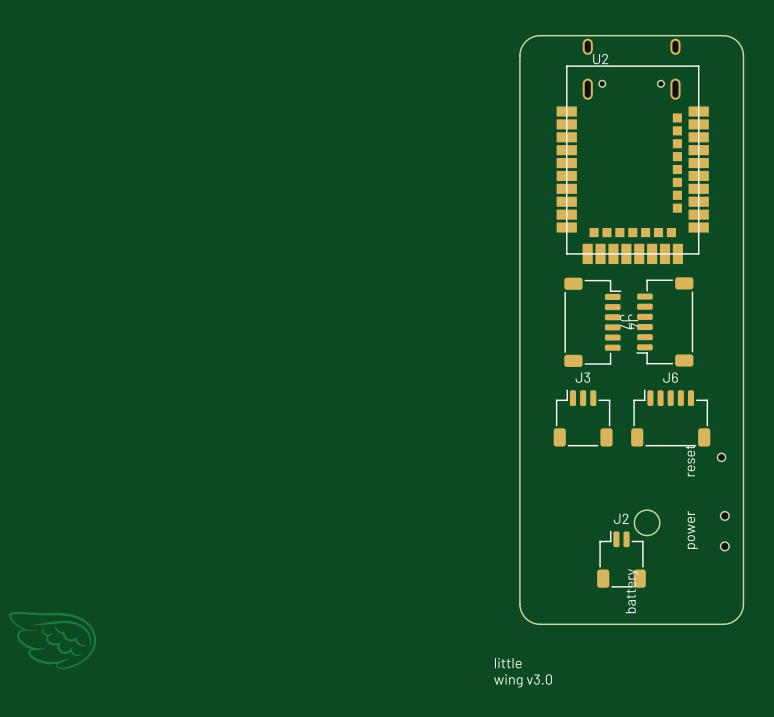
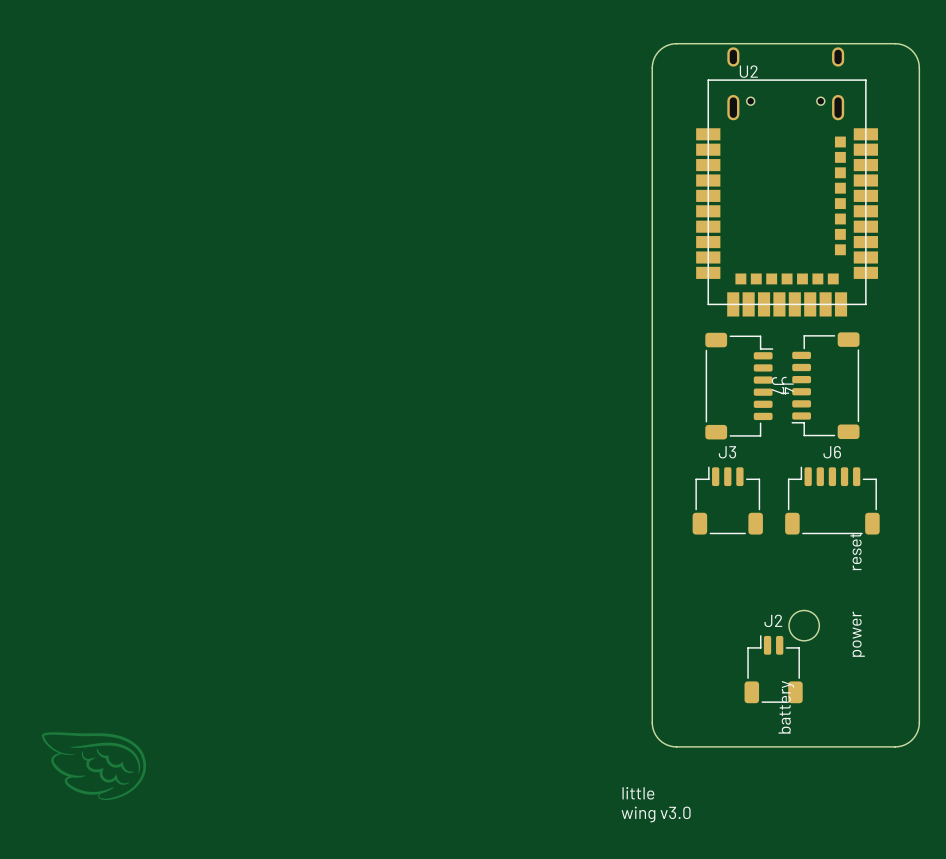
part: (721, 457) -> none
part: (724, 531) -> none

